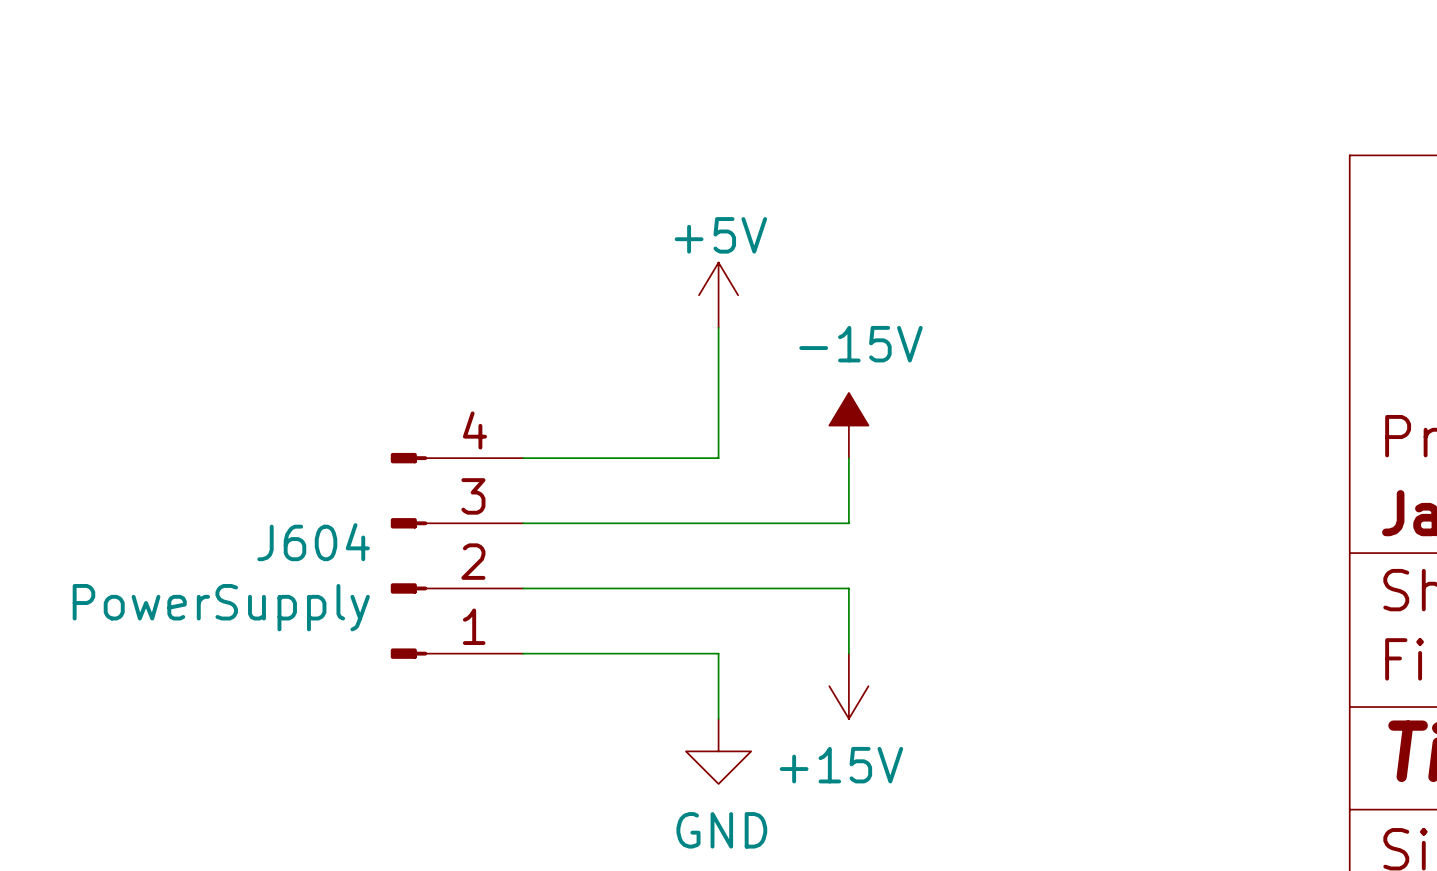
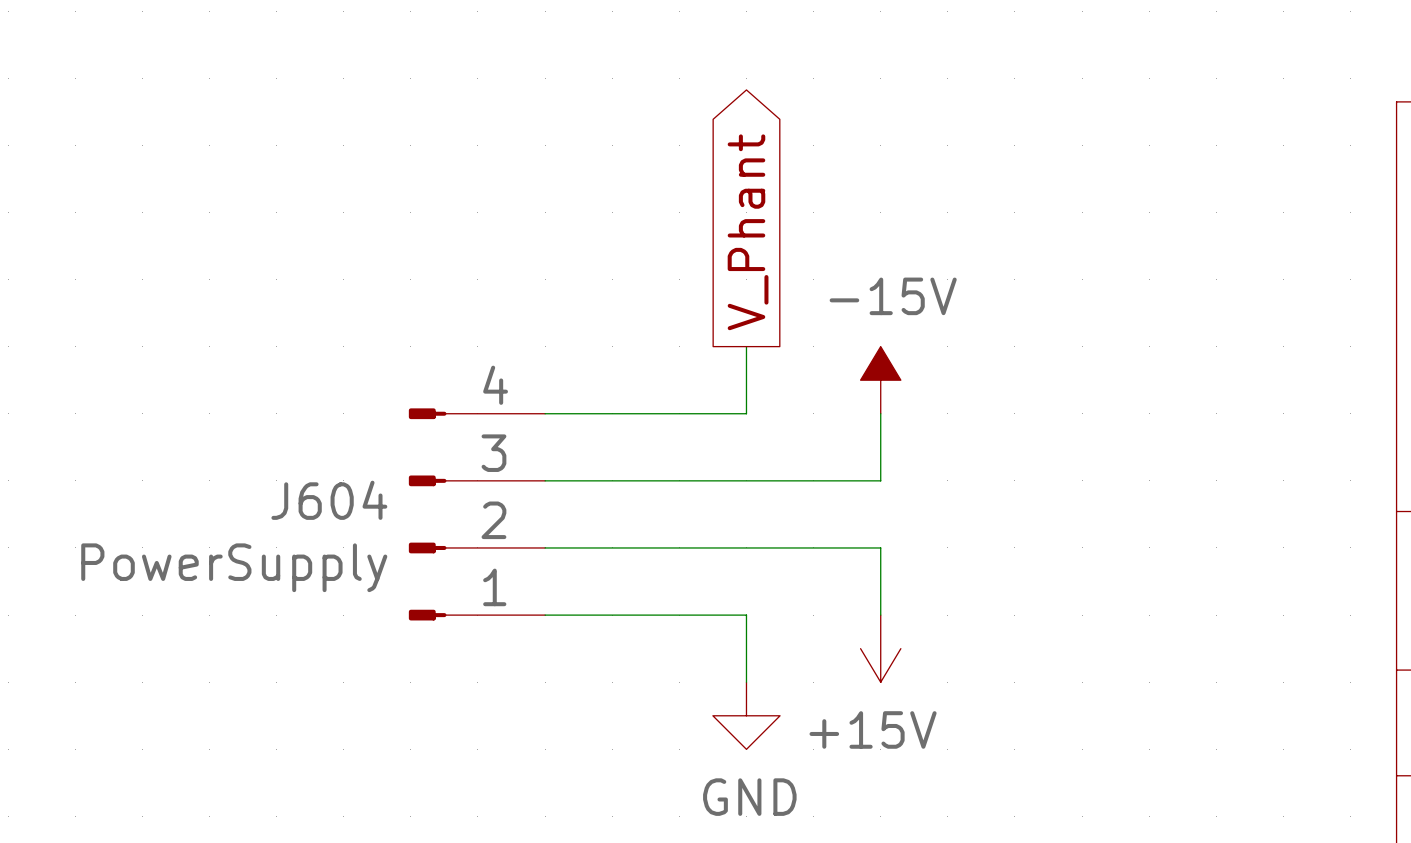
global label: none -> V_Phant (748, 232)
power symbol: +5V (718, 295) -> none
wire: (718, 327) (718, 392) -> none

